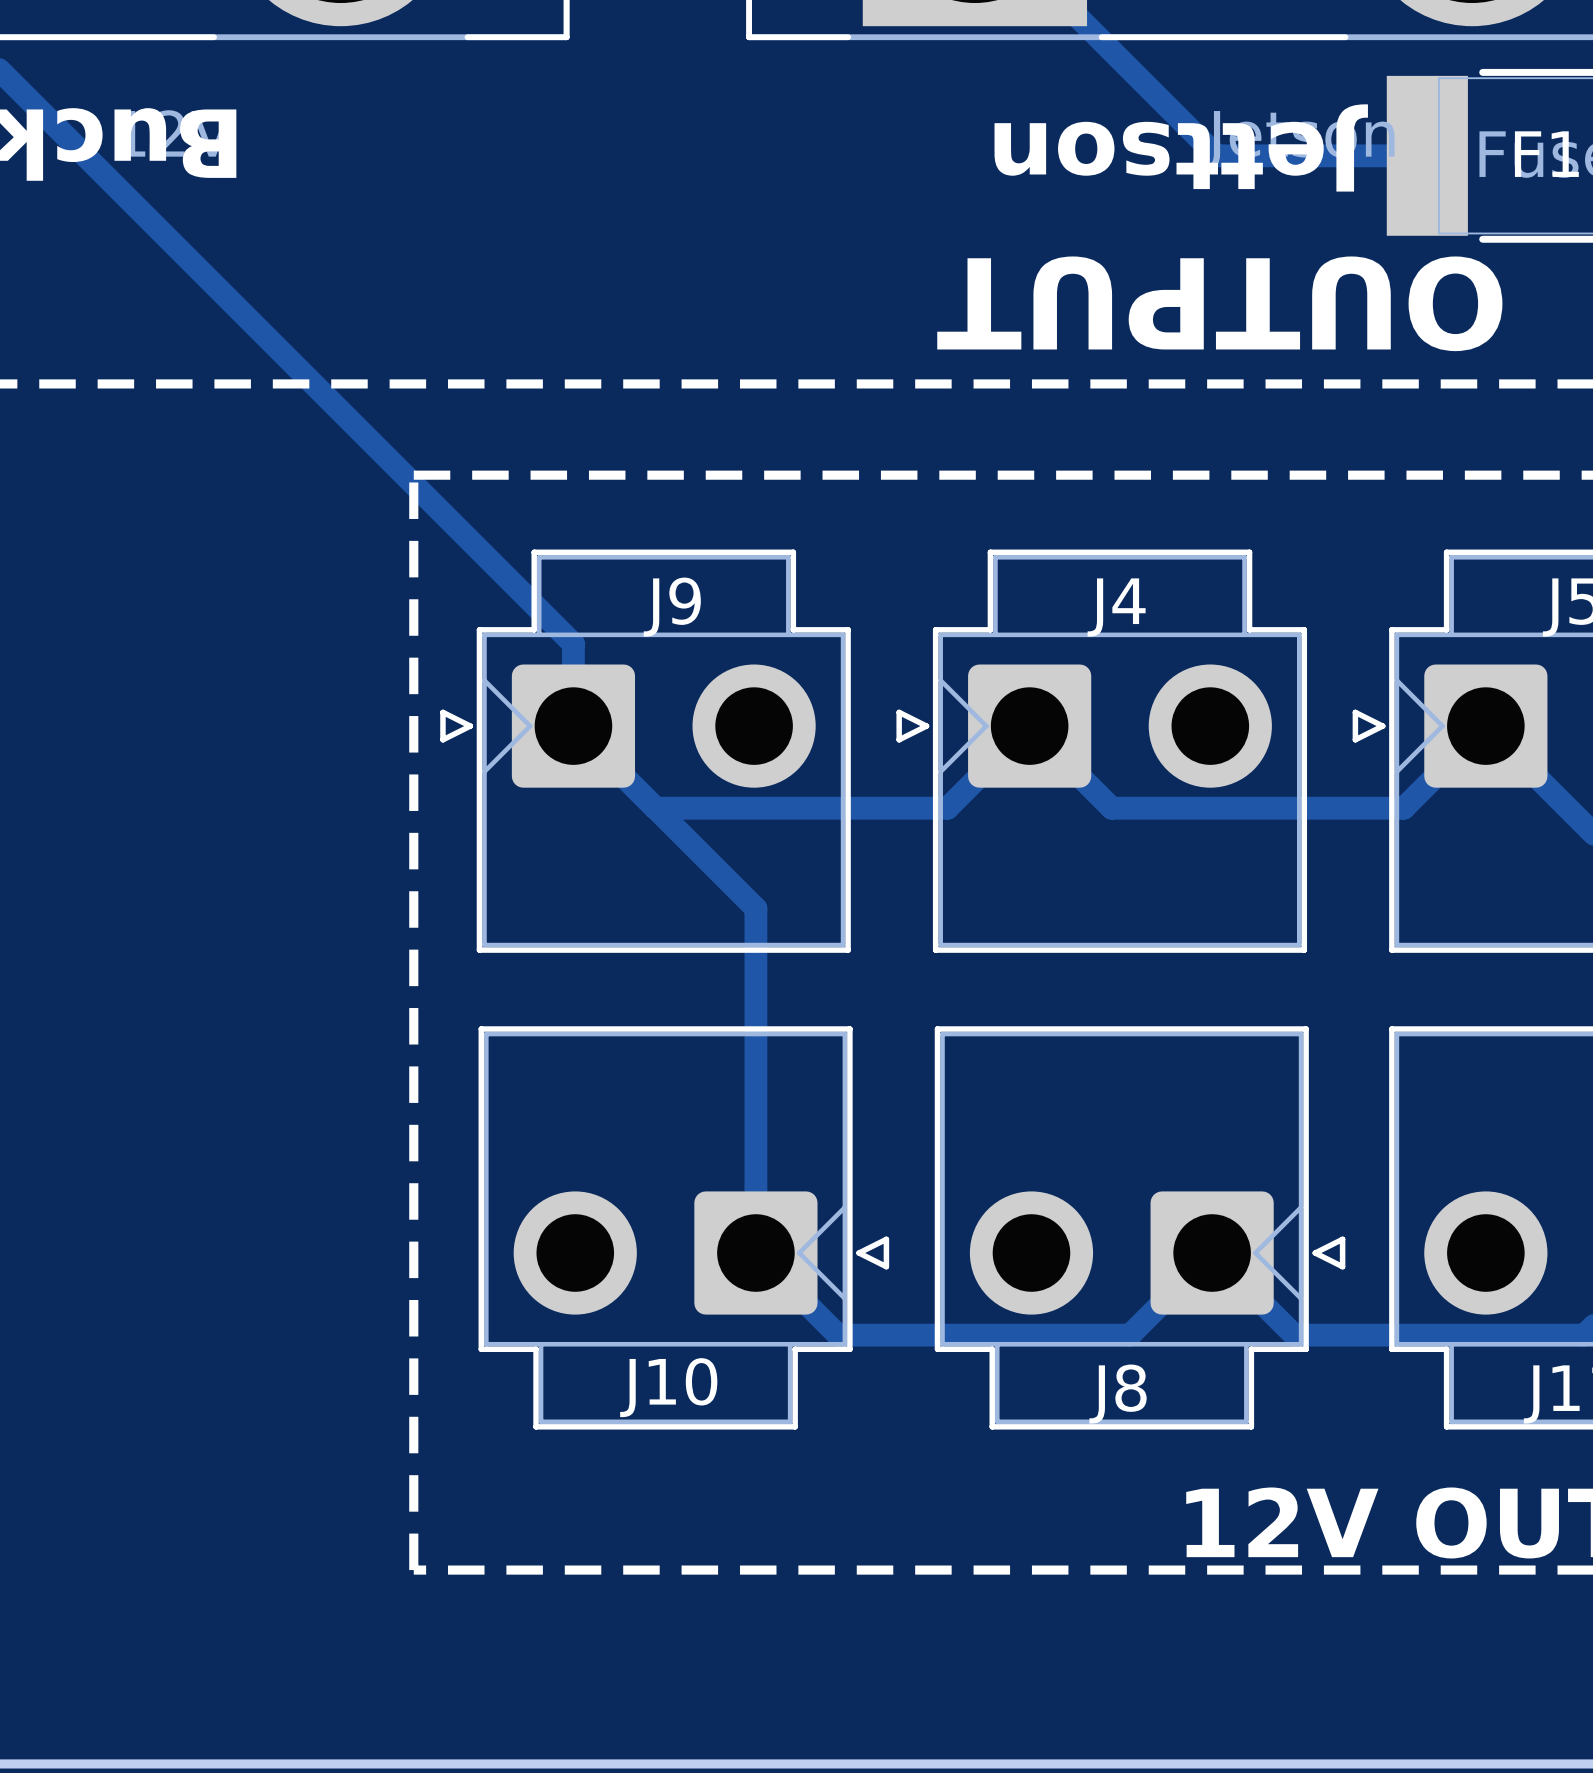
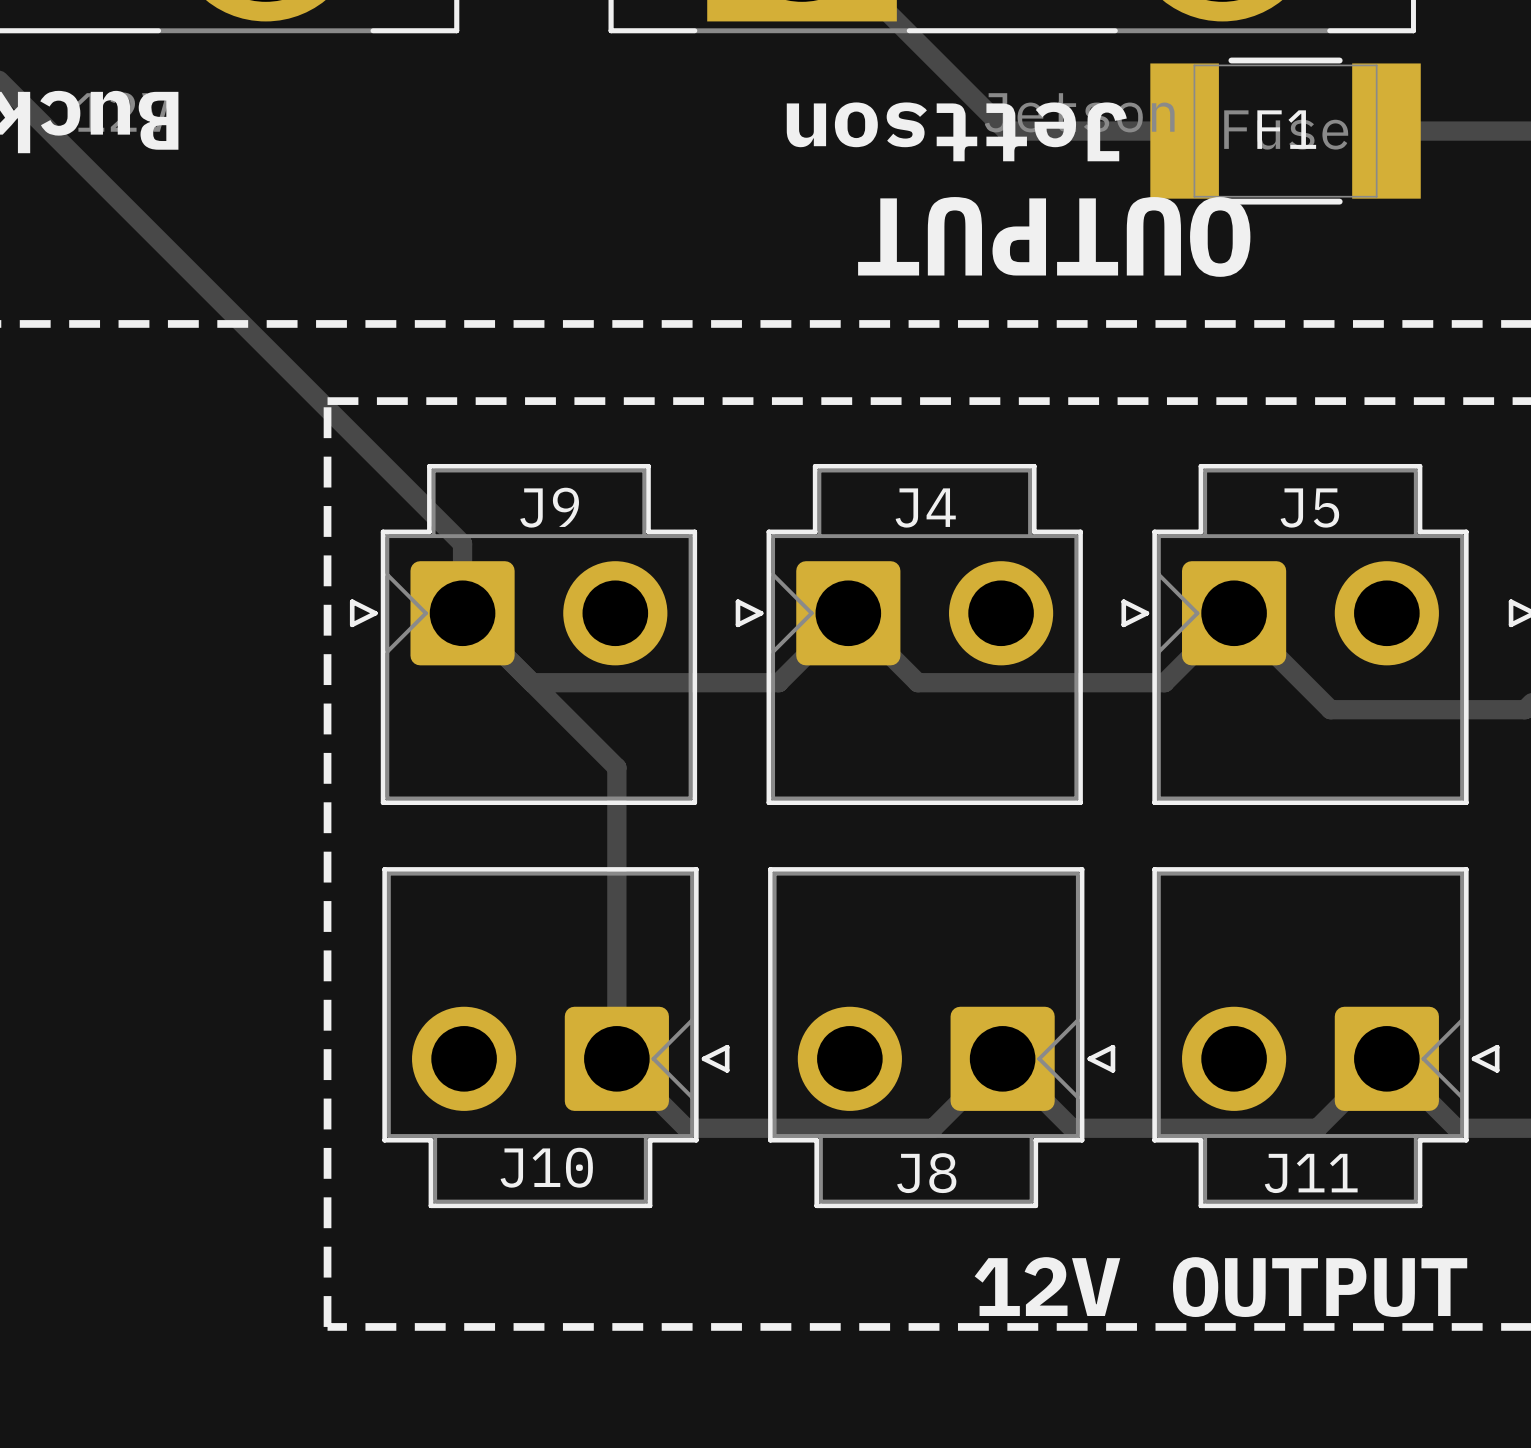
text position: OUTPUT (1219, 303) -> OUTPUT (1054, 236)

